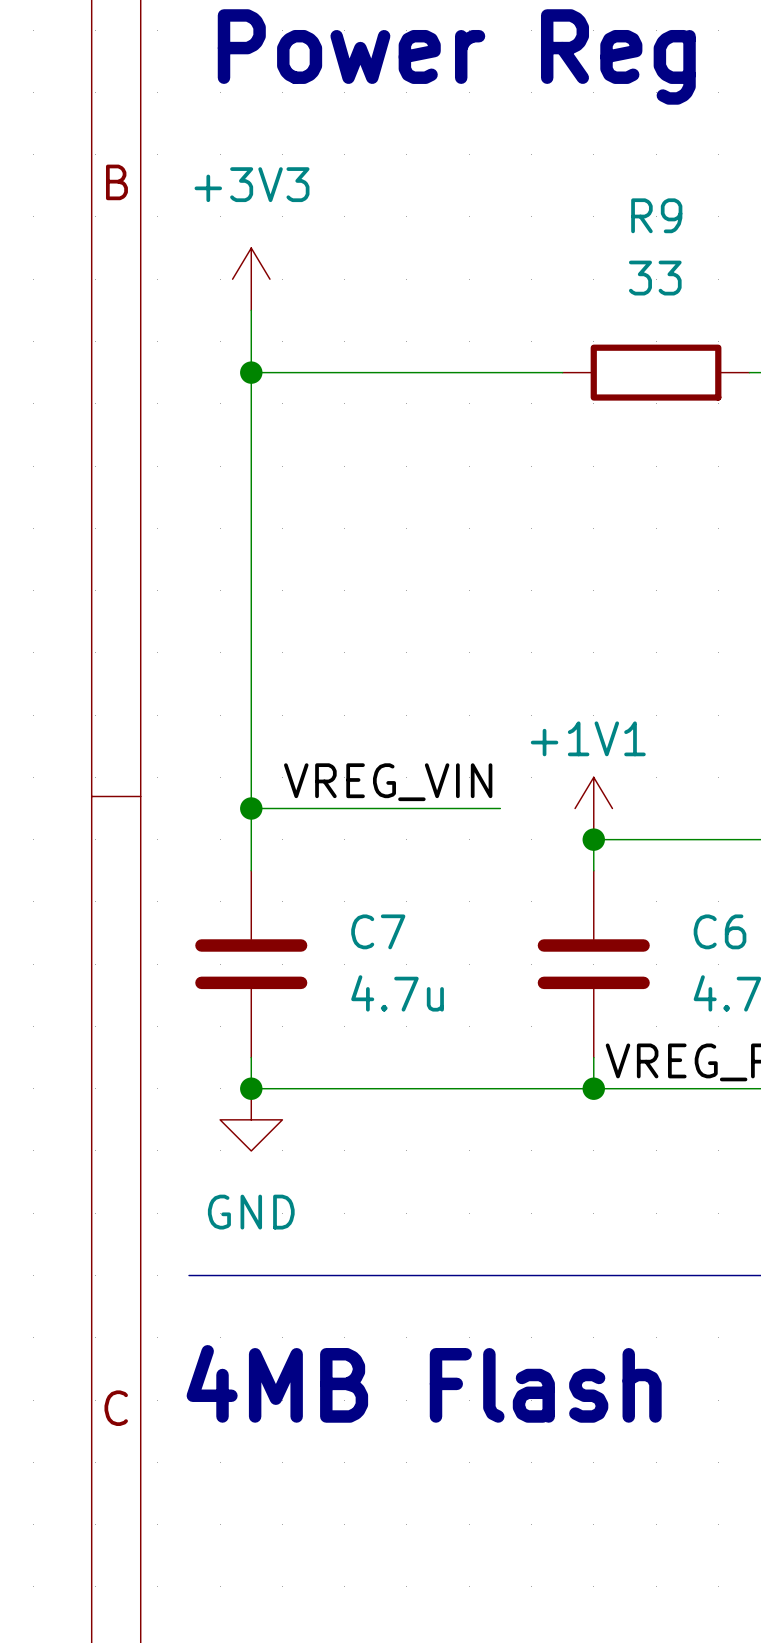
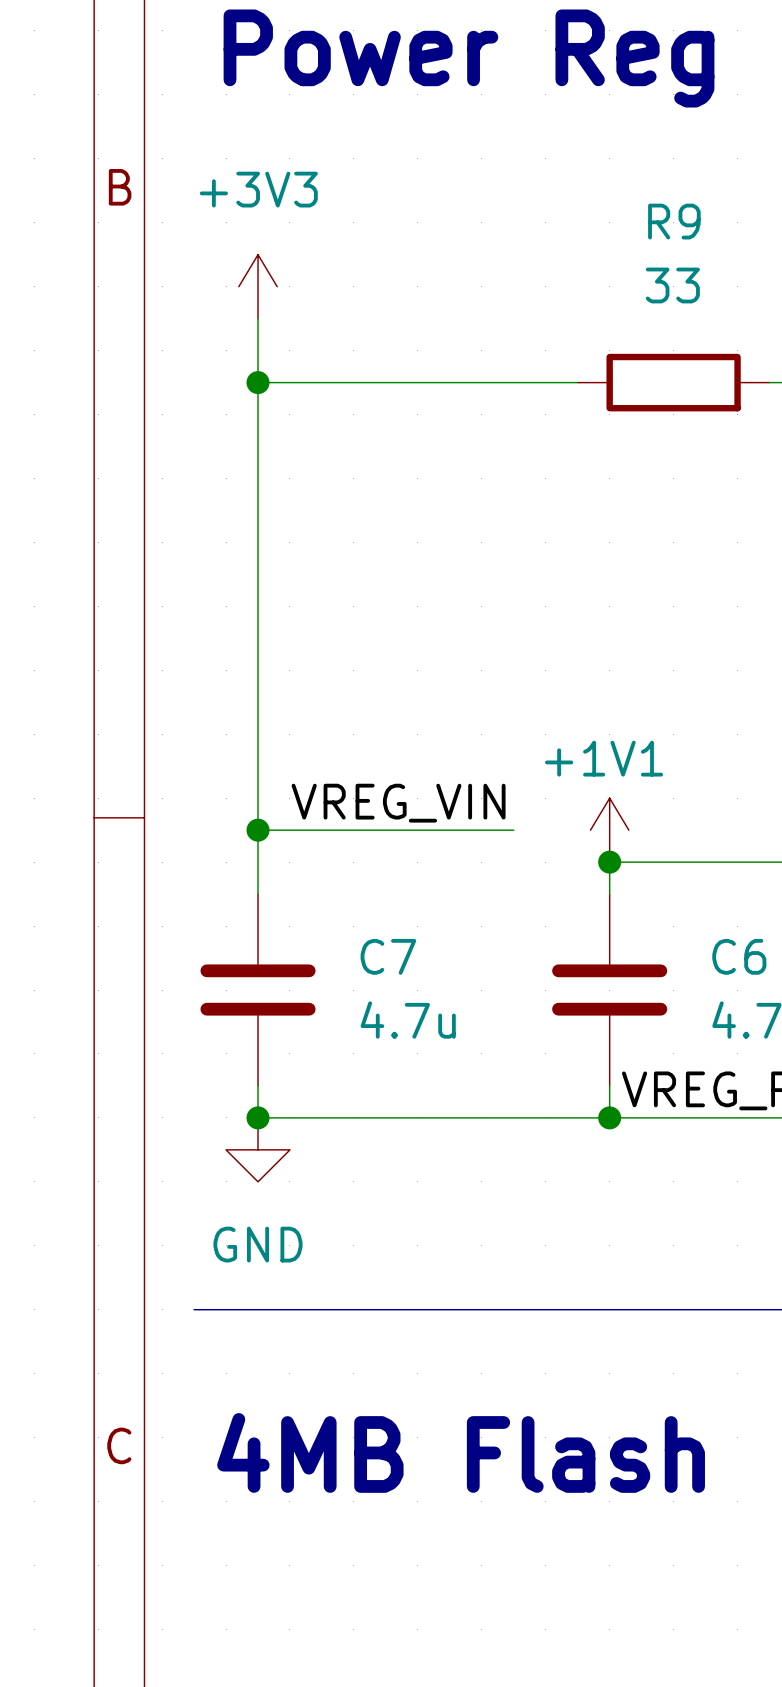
text position: 4MB Flash (424, 1383) -> 4MB Flash (461, 1452)

